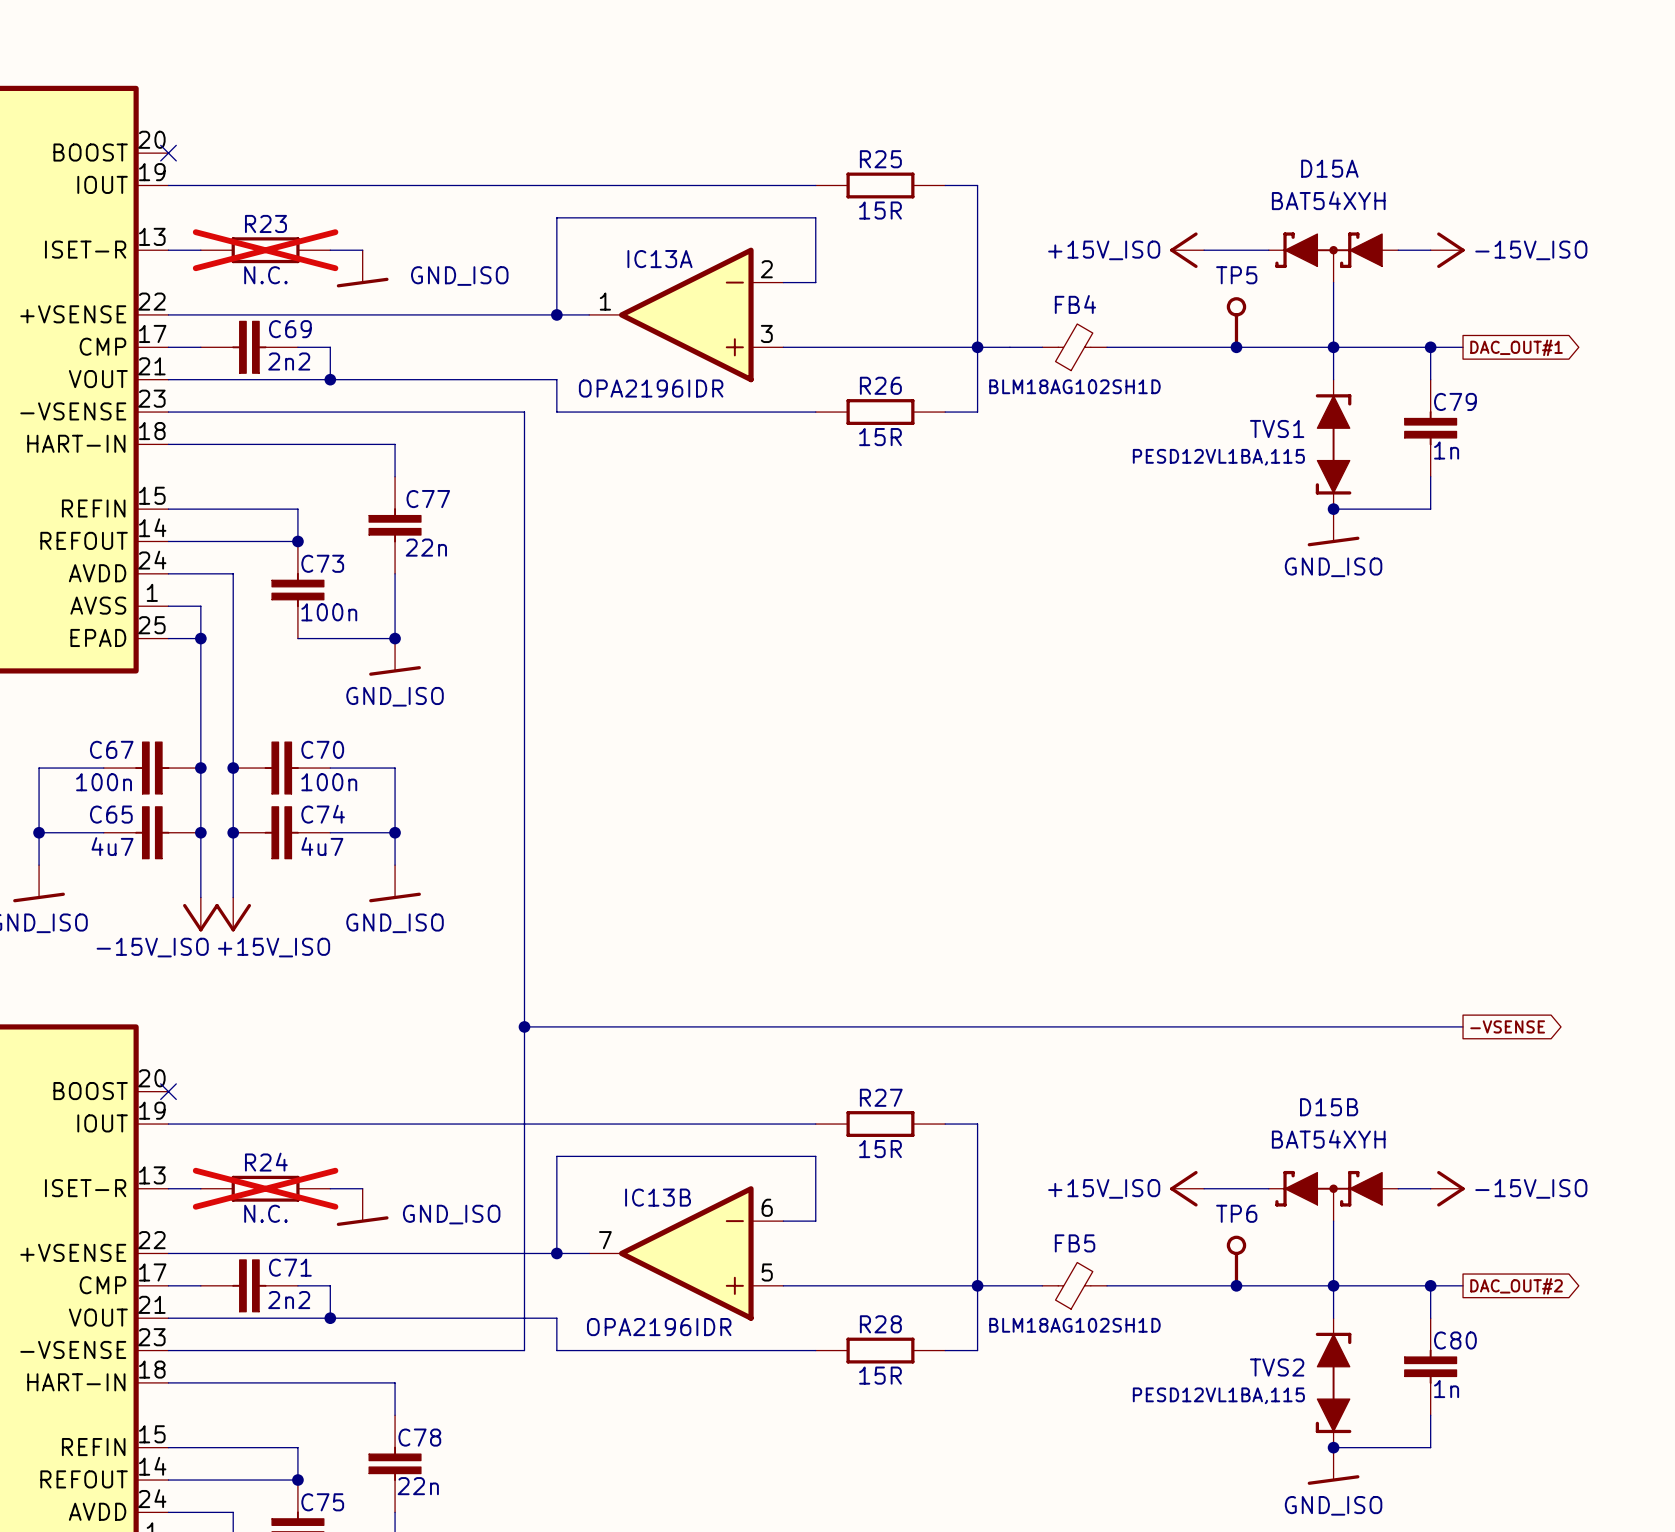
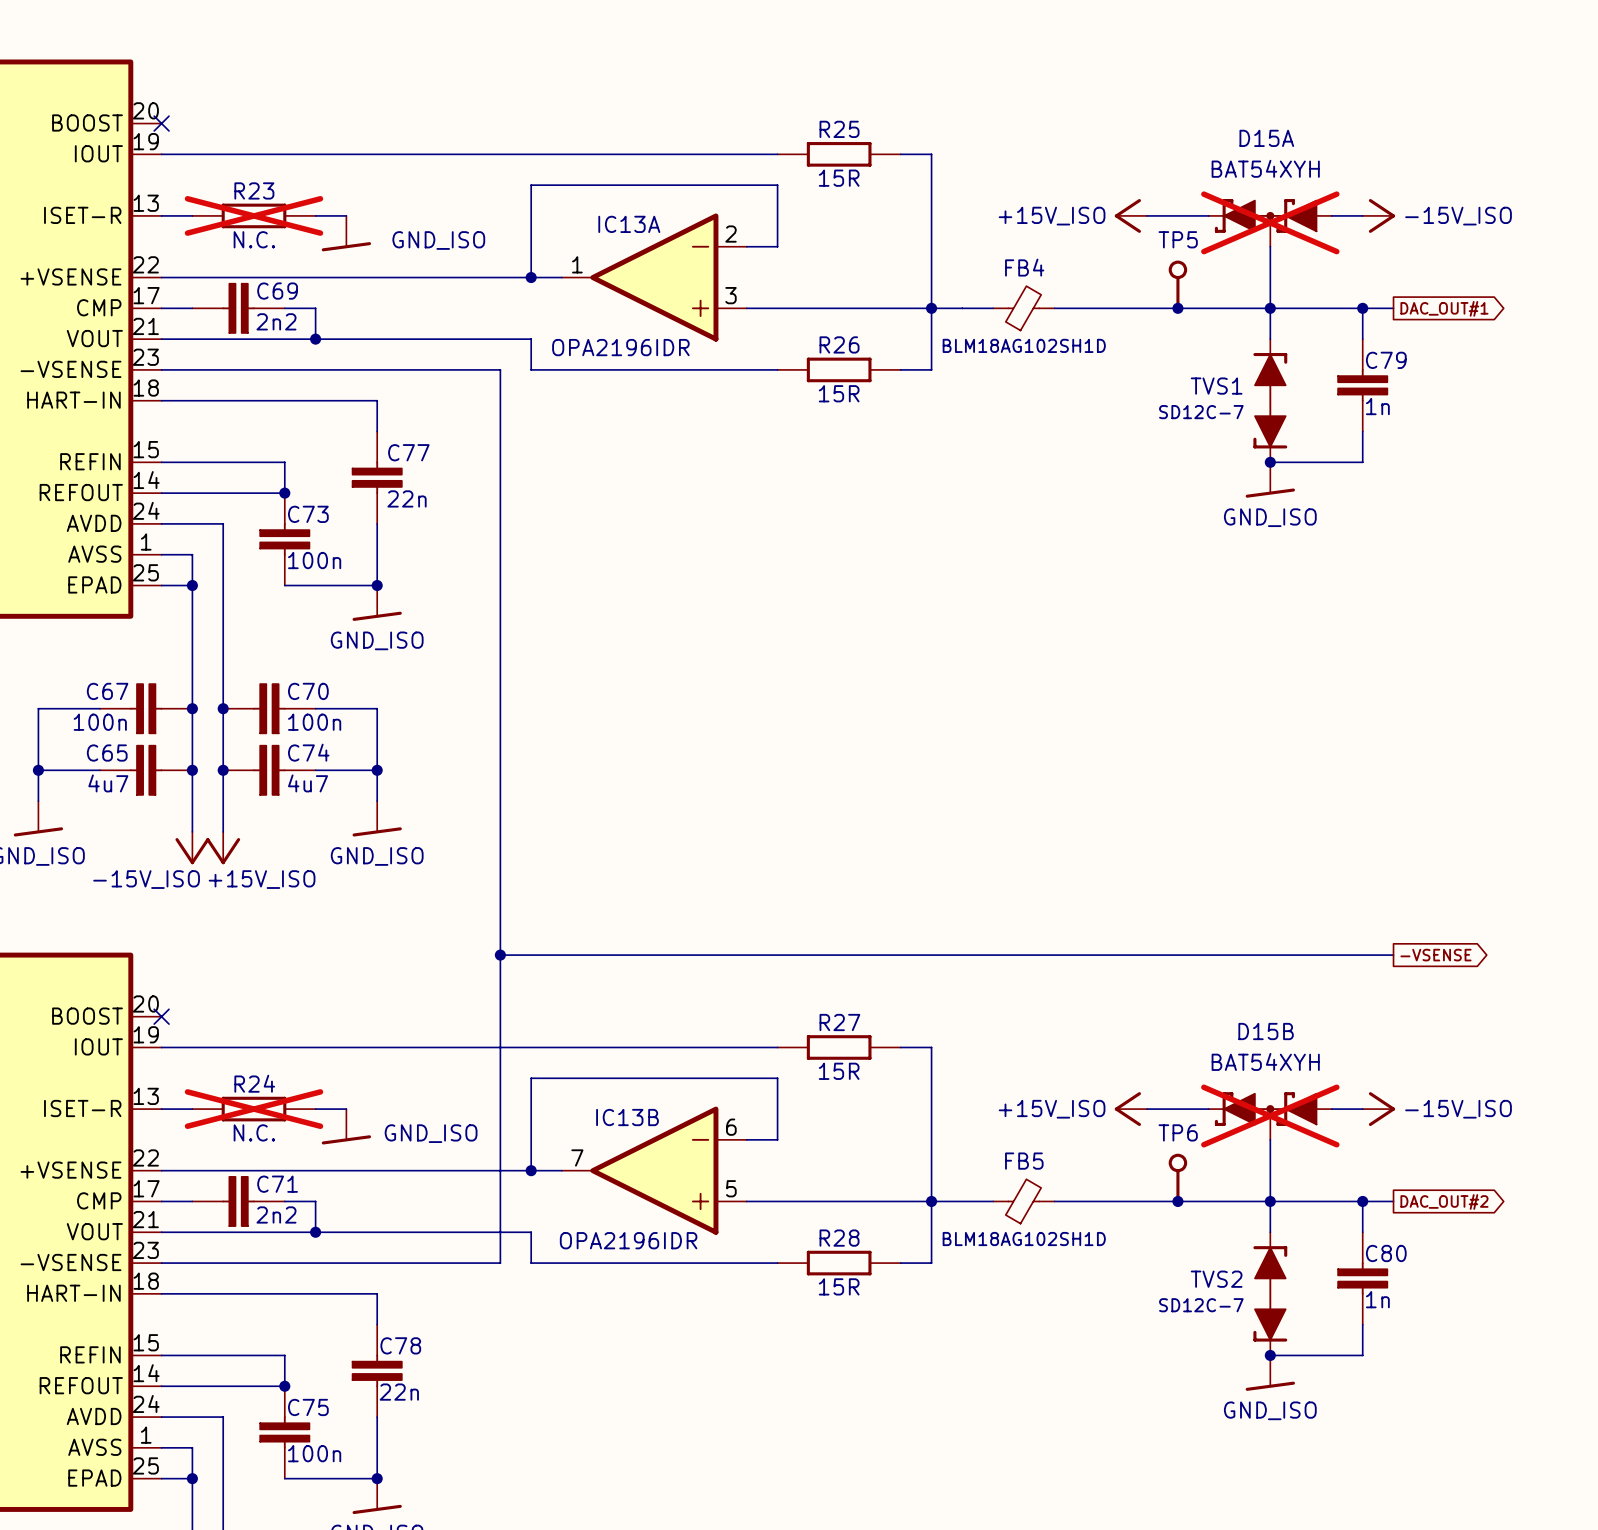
D15A do-not-place cross: none -> (1270, 222)
TVS1 value: PESD12VL1BA,115 (1218, 457) -> SD12C-7 (1201, 412)
D15B do-not-place cross: none -> (1270, 1116)
TVS2 value: PESD12VL1BA,115 (1218, 1395) -> SD12C-7 (1201, 1305)

